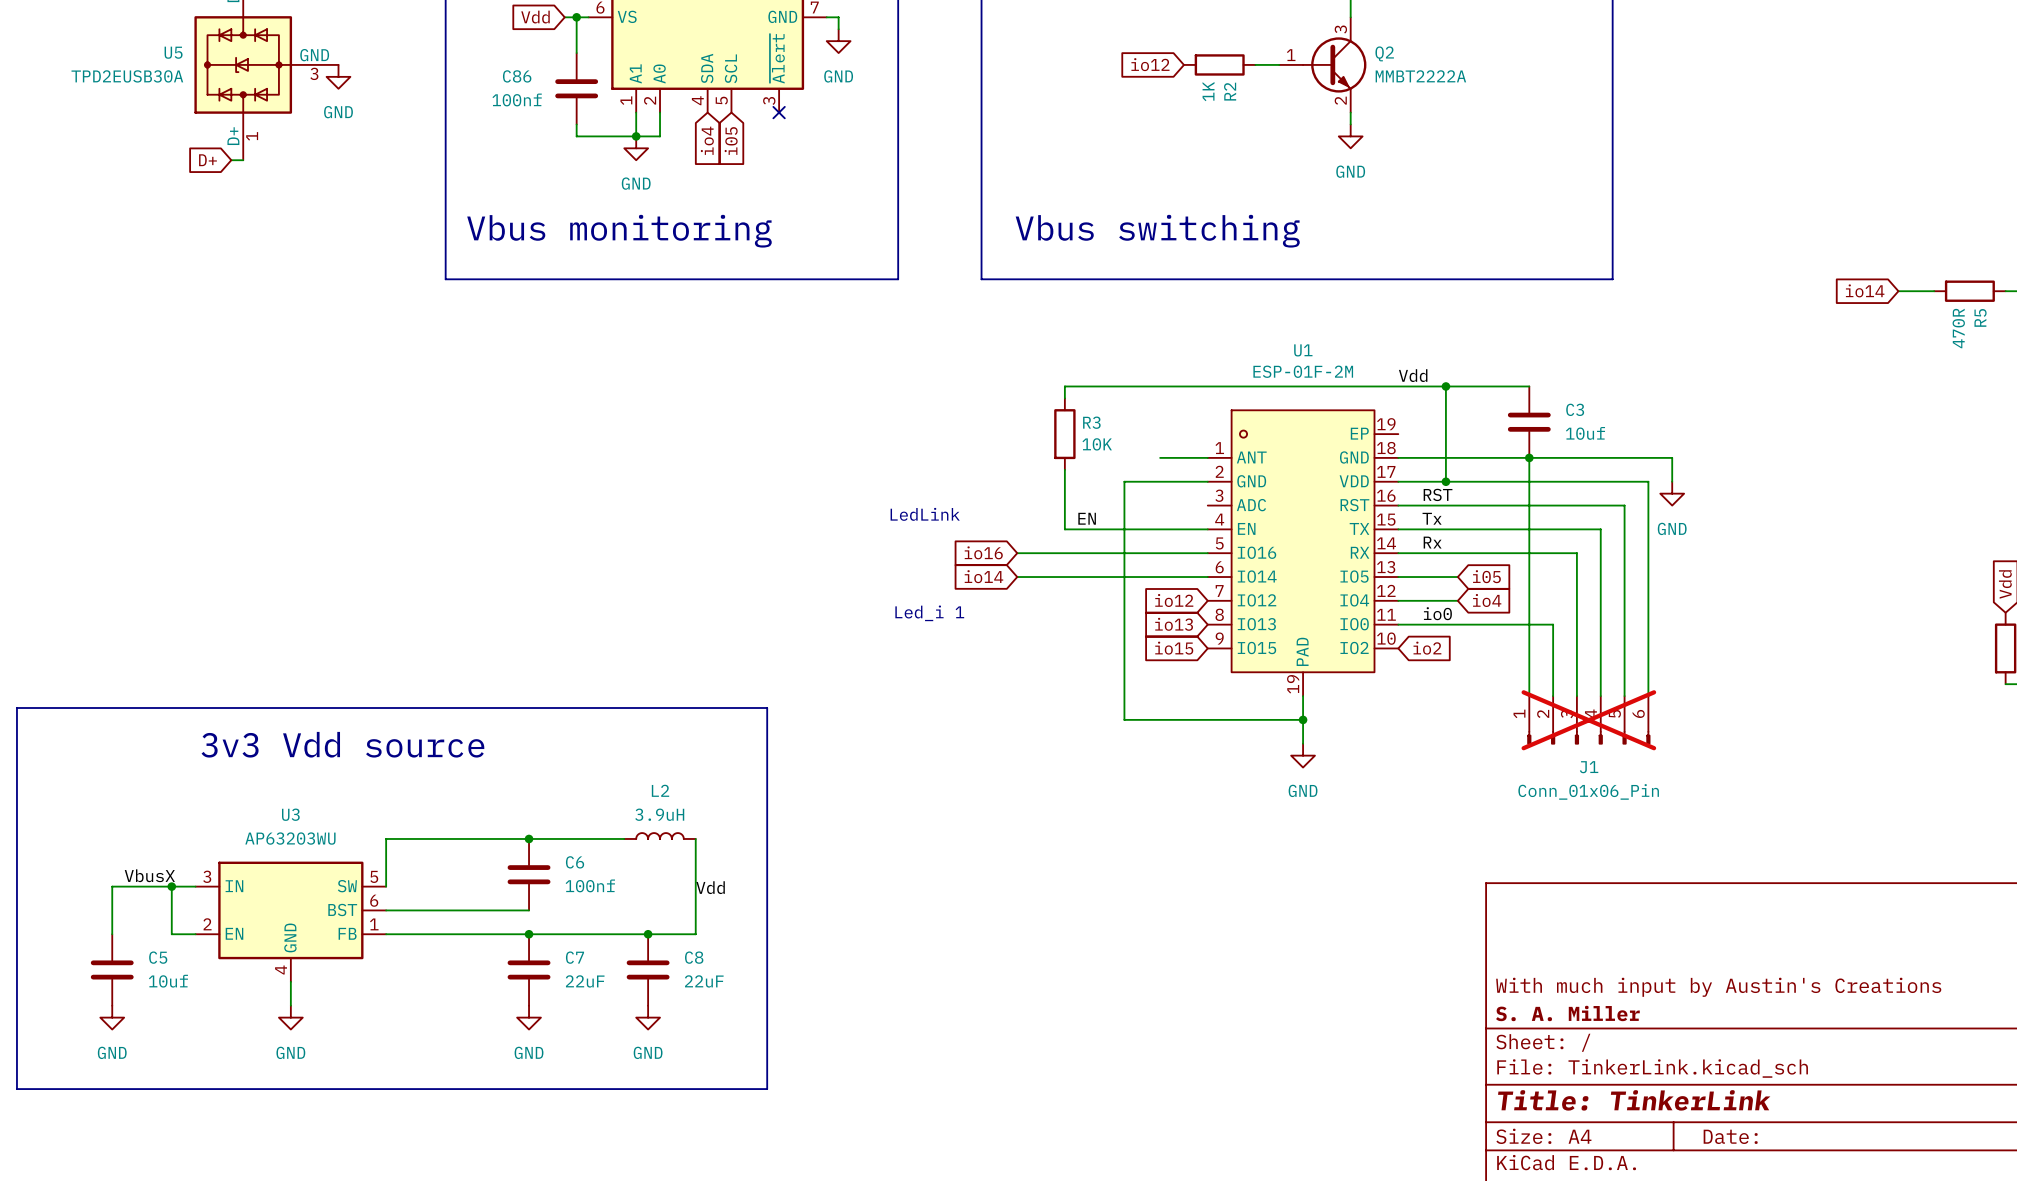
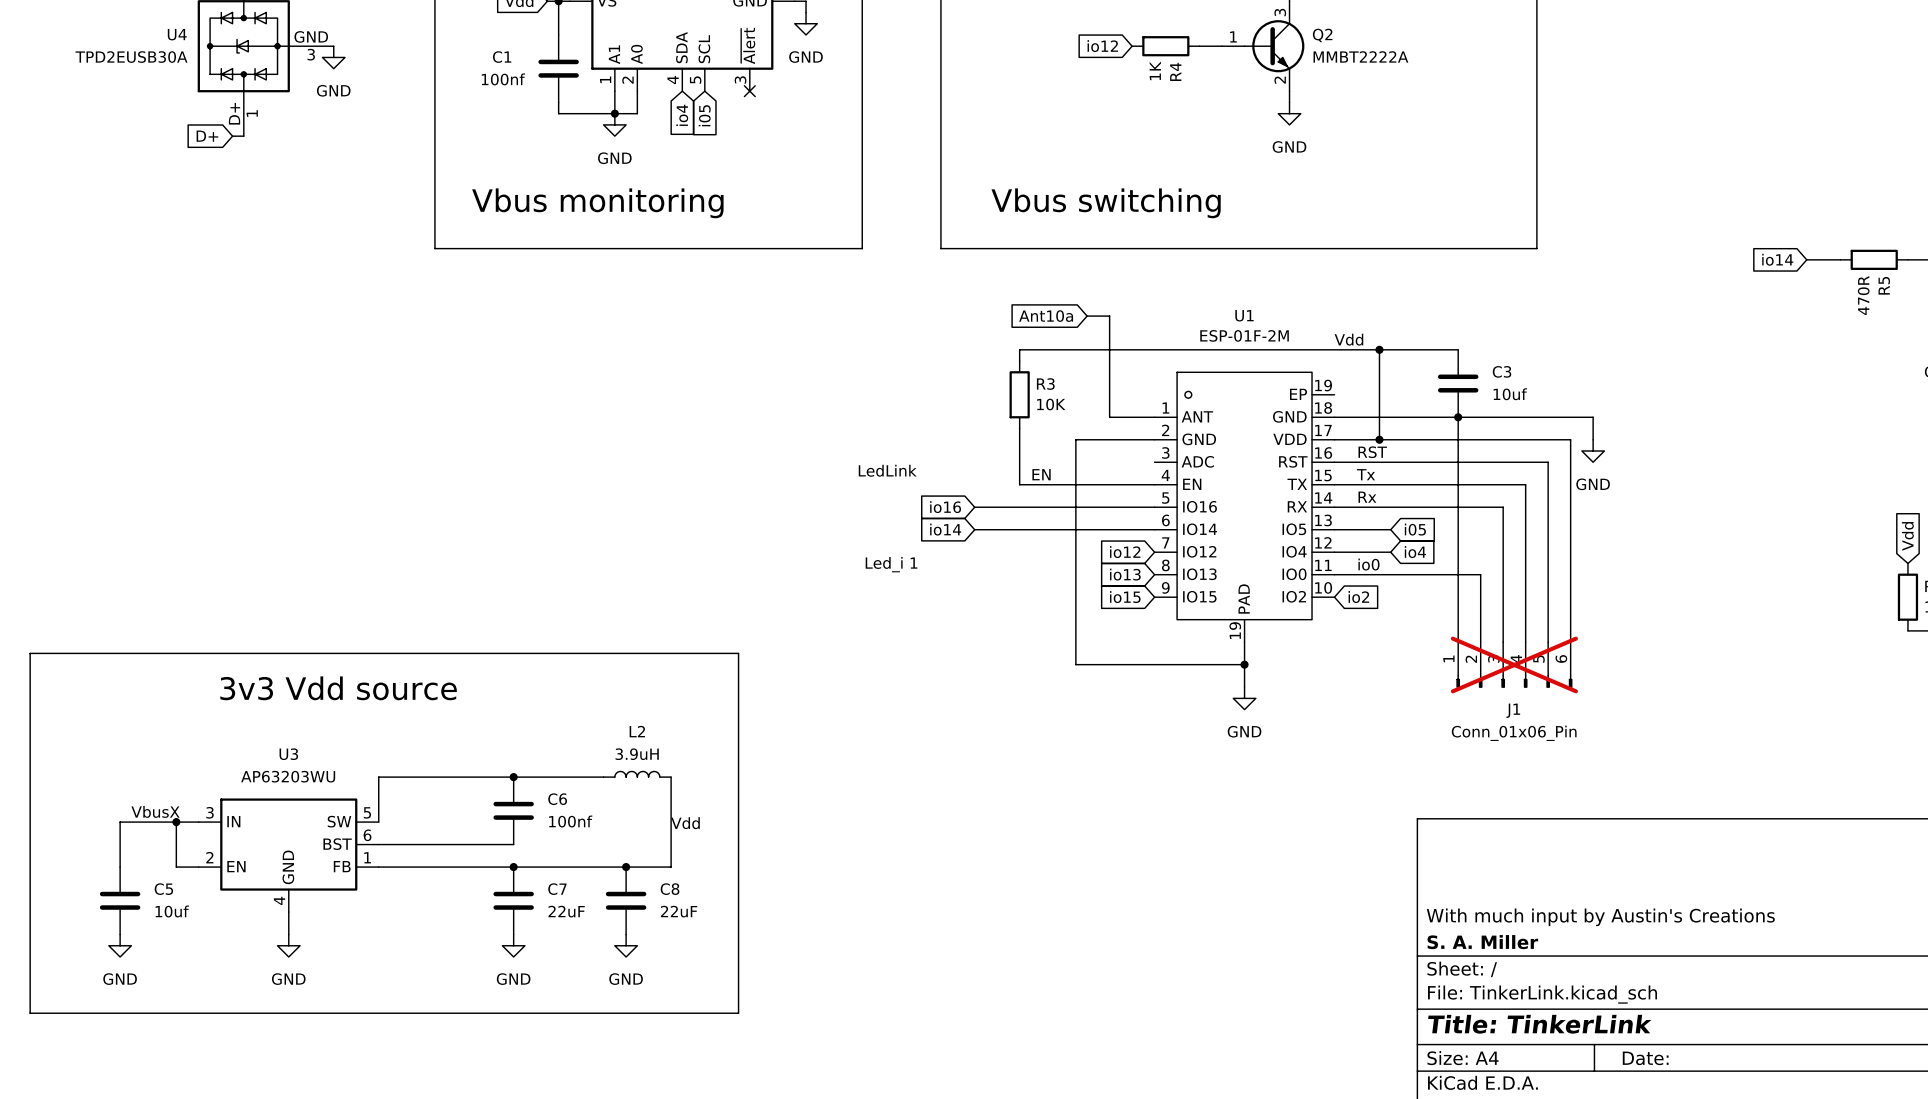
U5 name: U5 (173, 52) -> U4 (177, 34)
C86 name: C86 (517, 76) -> C1 (502, 57)
R2 name: R2 (1230, 91) -> R4 (1175, 71)
global label: none -> Ant10a (1046, 316)
wire: none -> (1087, 316) (1109, 316) (1109, 417)

